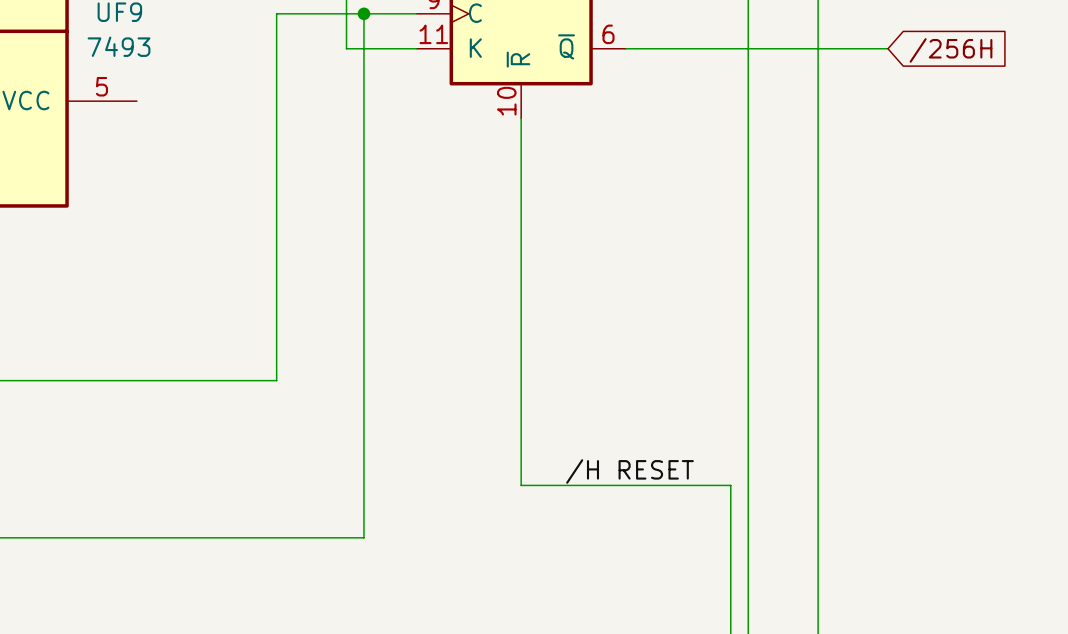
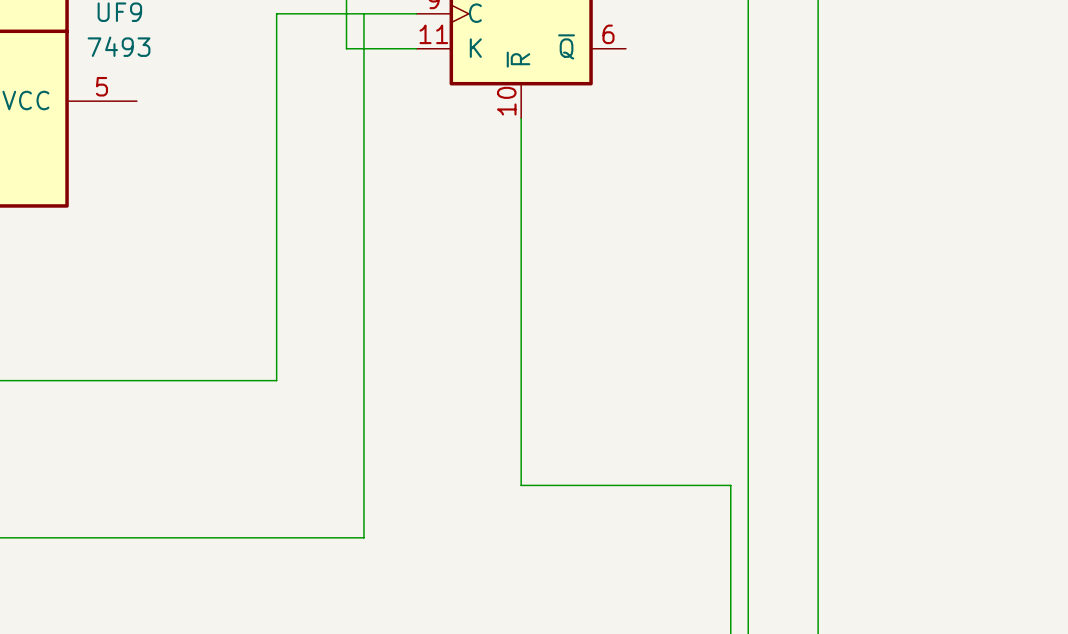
junction: (363, 13) -> none
wire: (625, 48) (887, 48) -> none
global label: /256H (951, 50) -> none
label: /H RESET (630, 471) -> none

